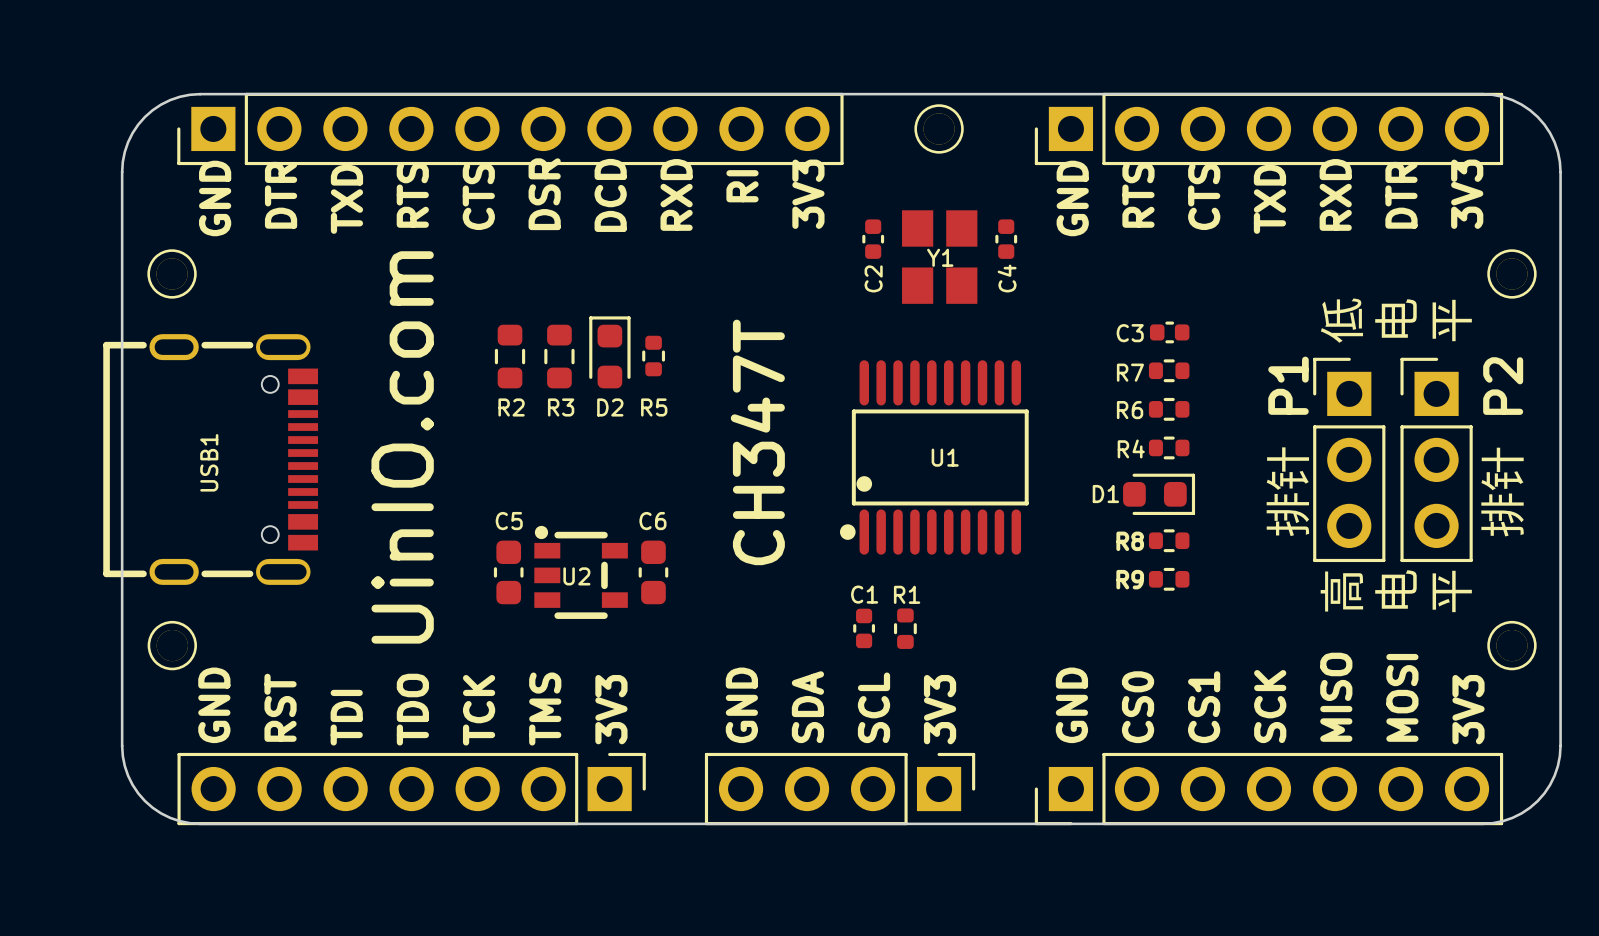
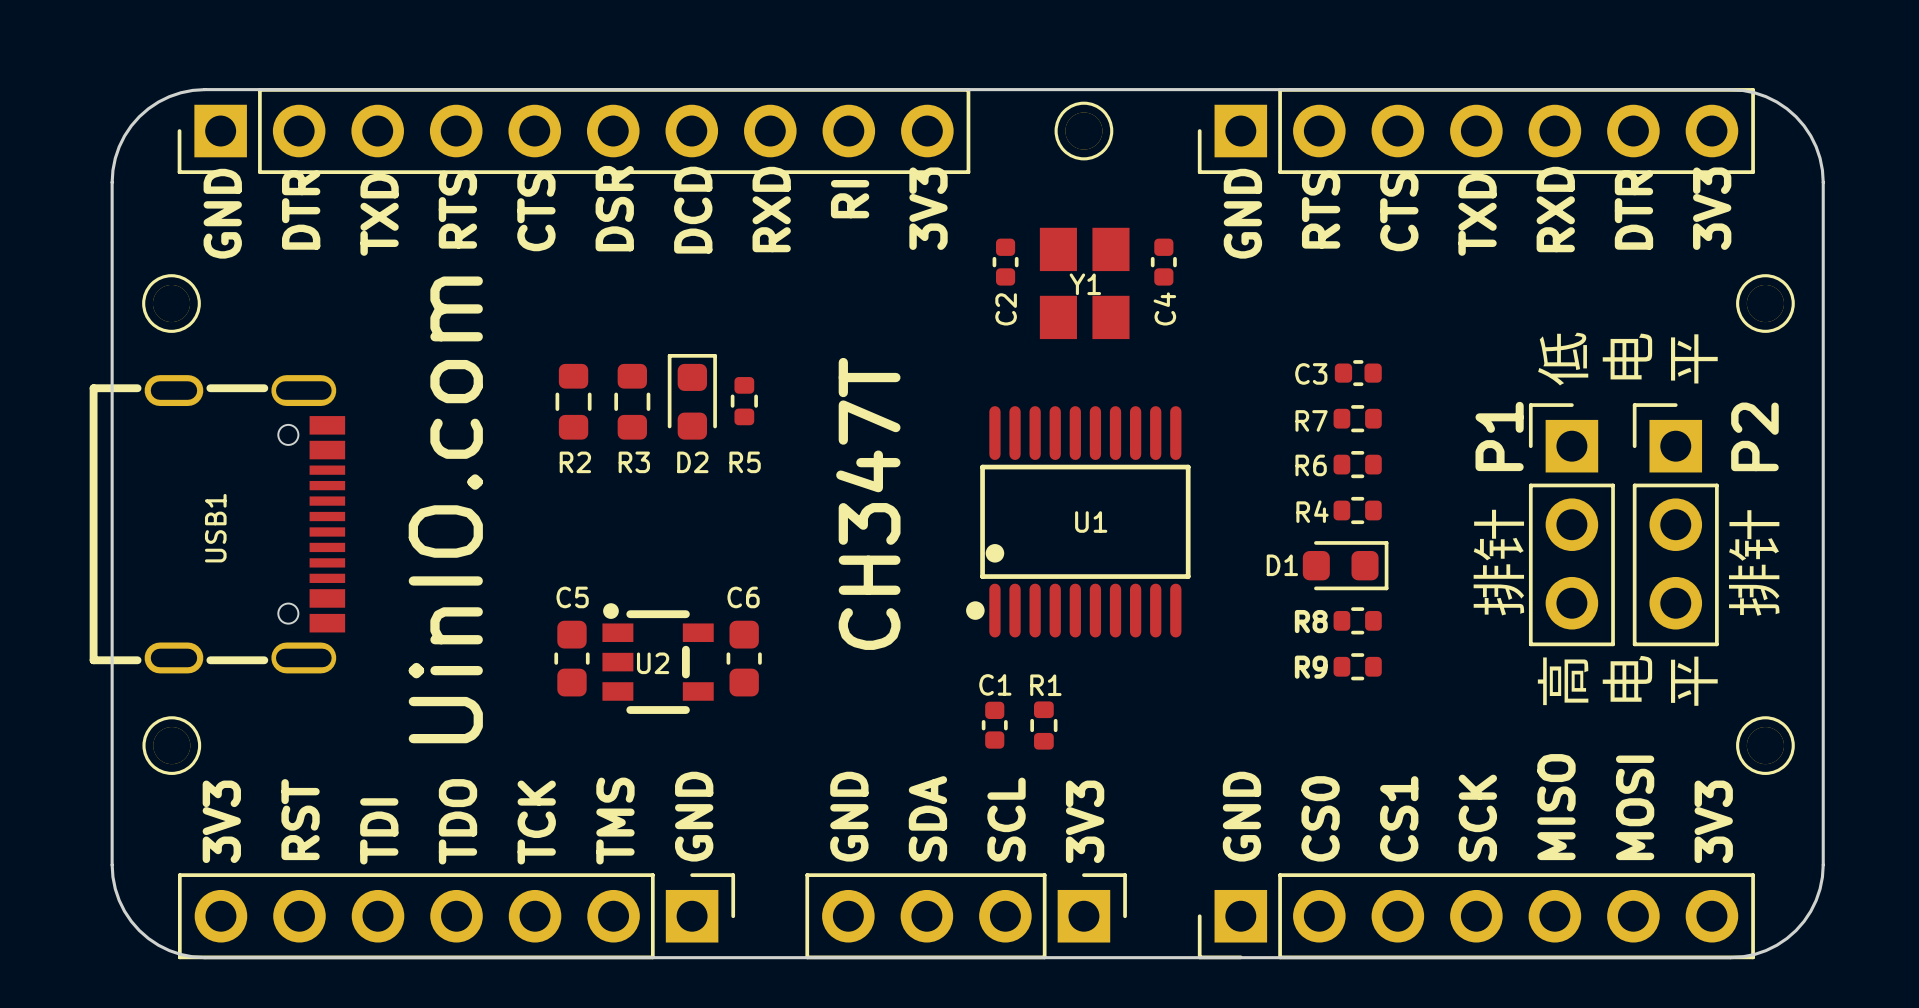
text: GND (214, 705) -> 3V3 (221, 821)
text: 3V3 (611, 709) -> GND (694, 816)

